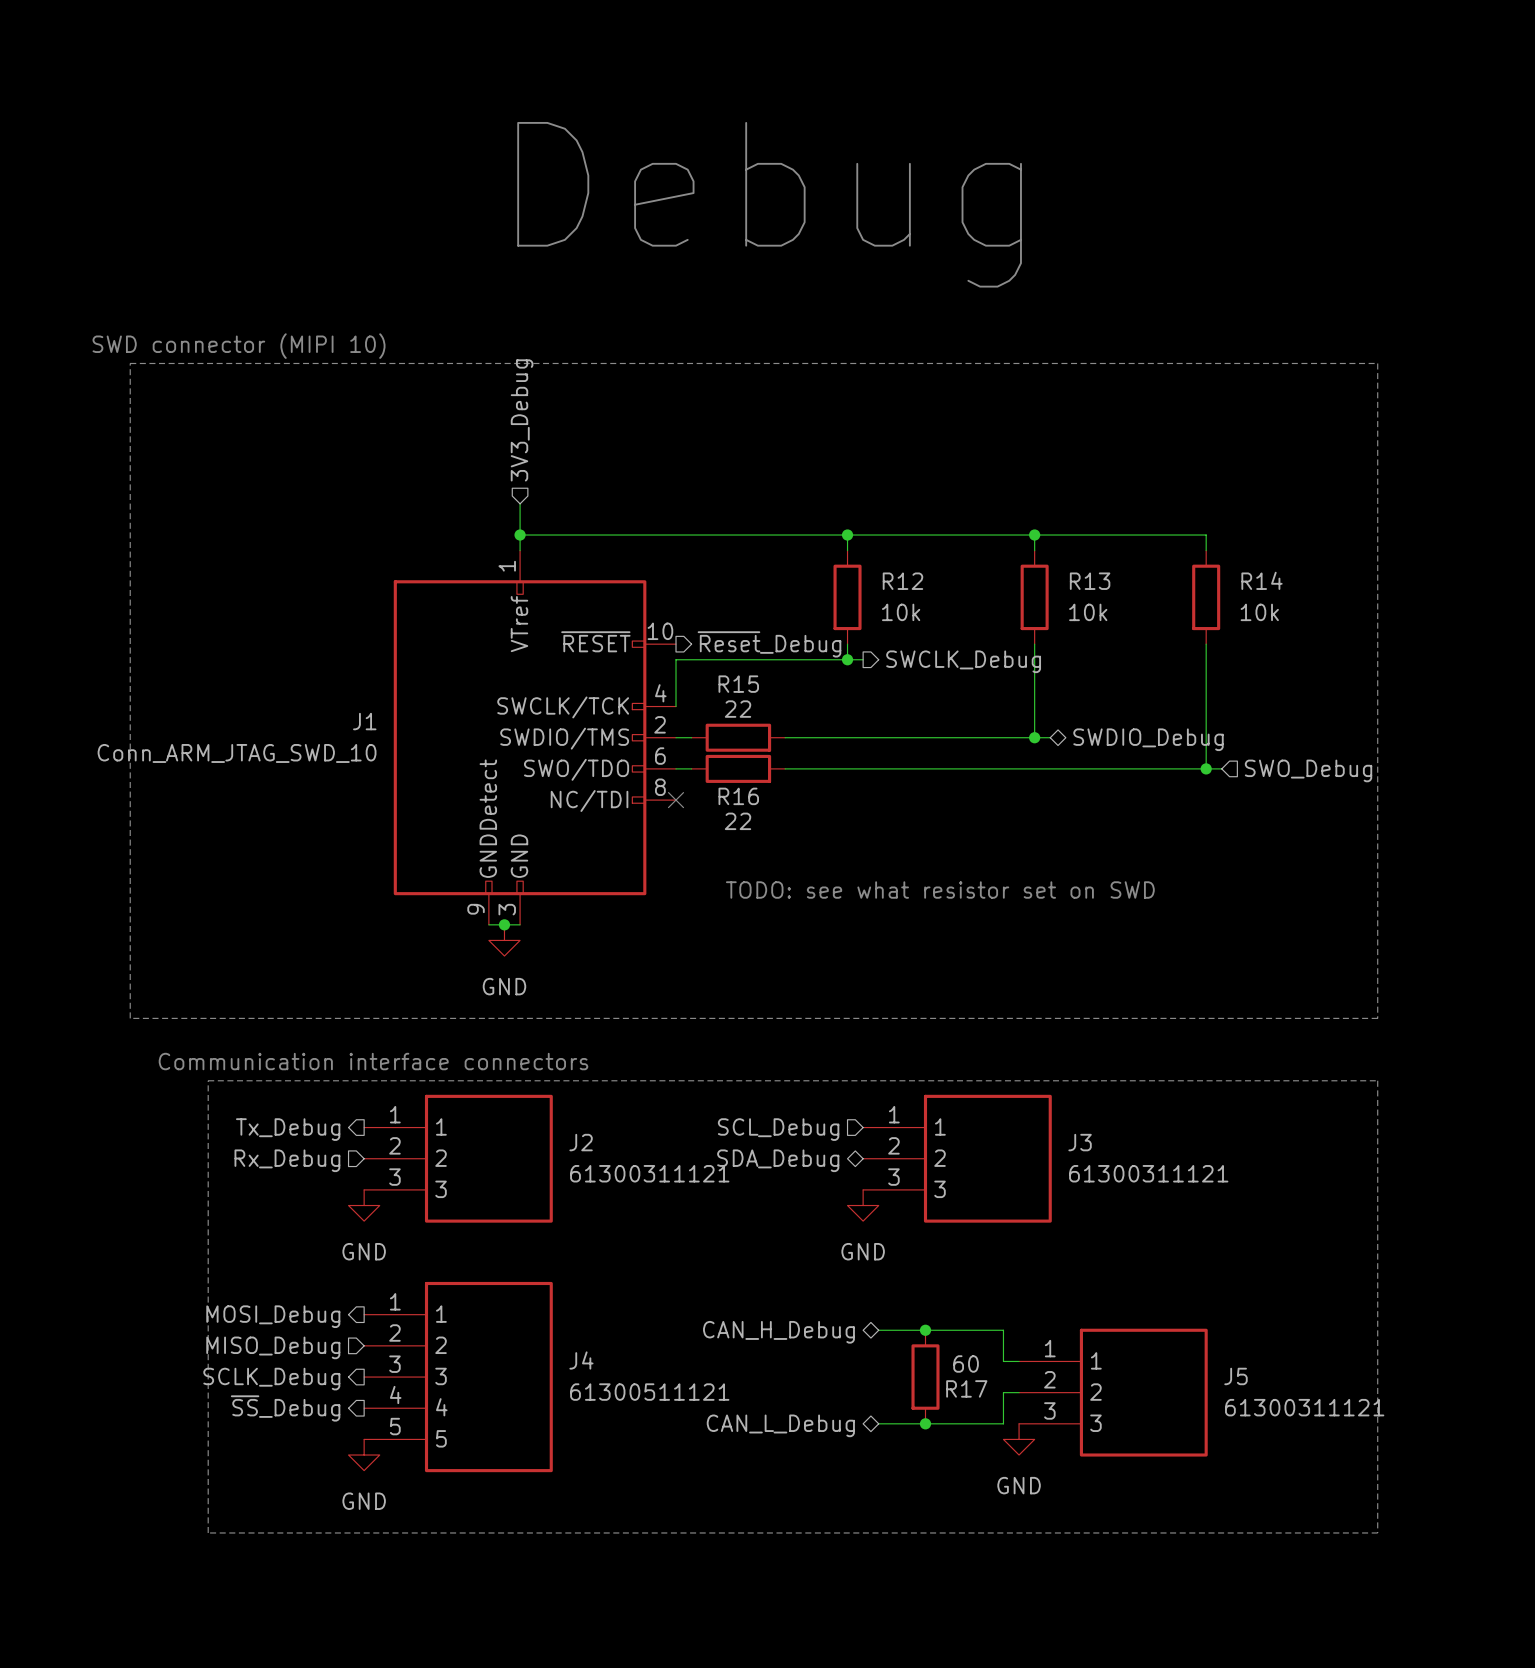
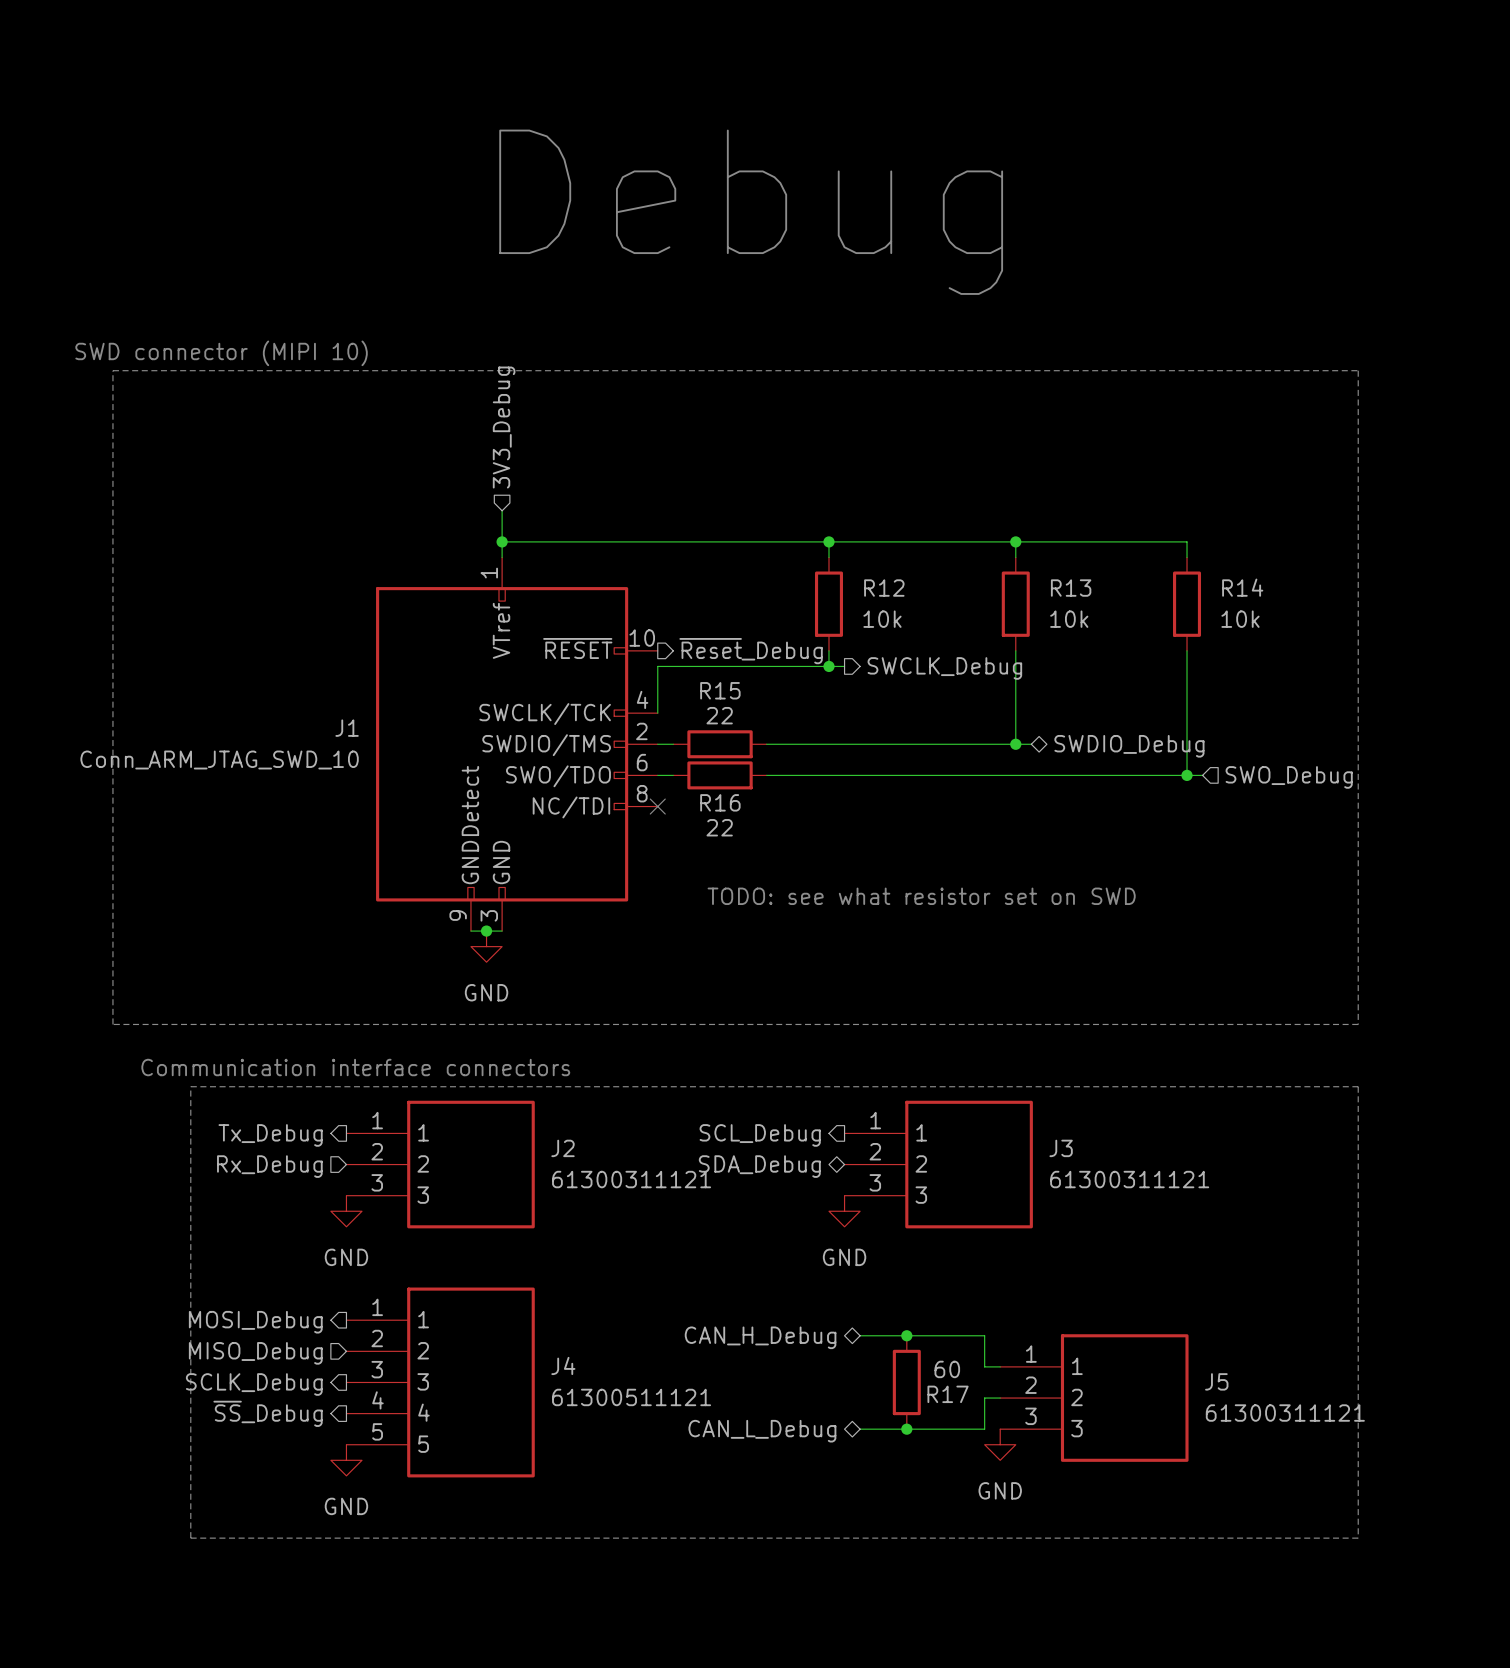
hierarchical label shape: input (778, 1129) -> output (760, 1135)

